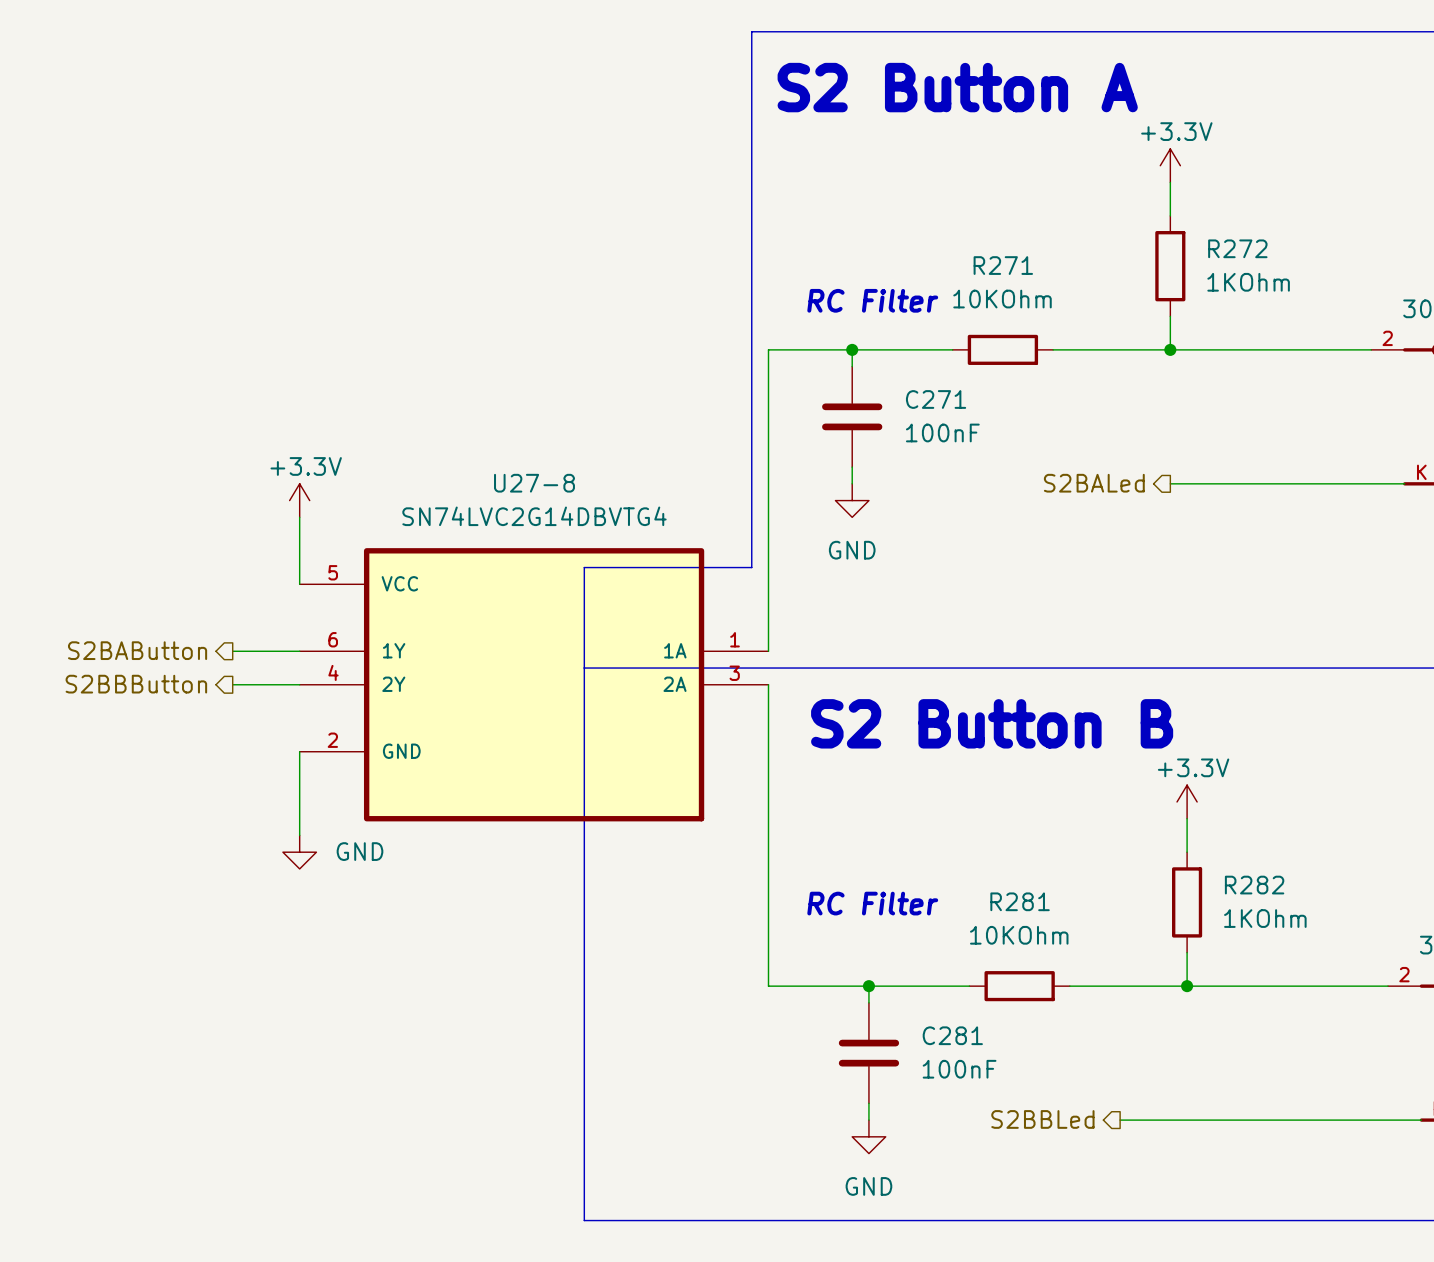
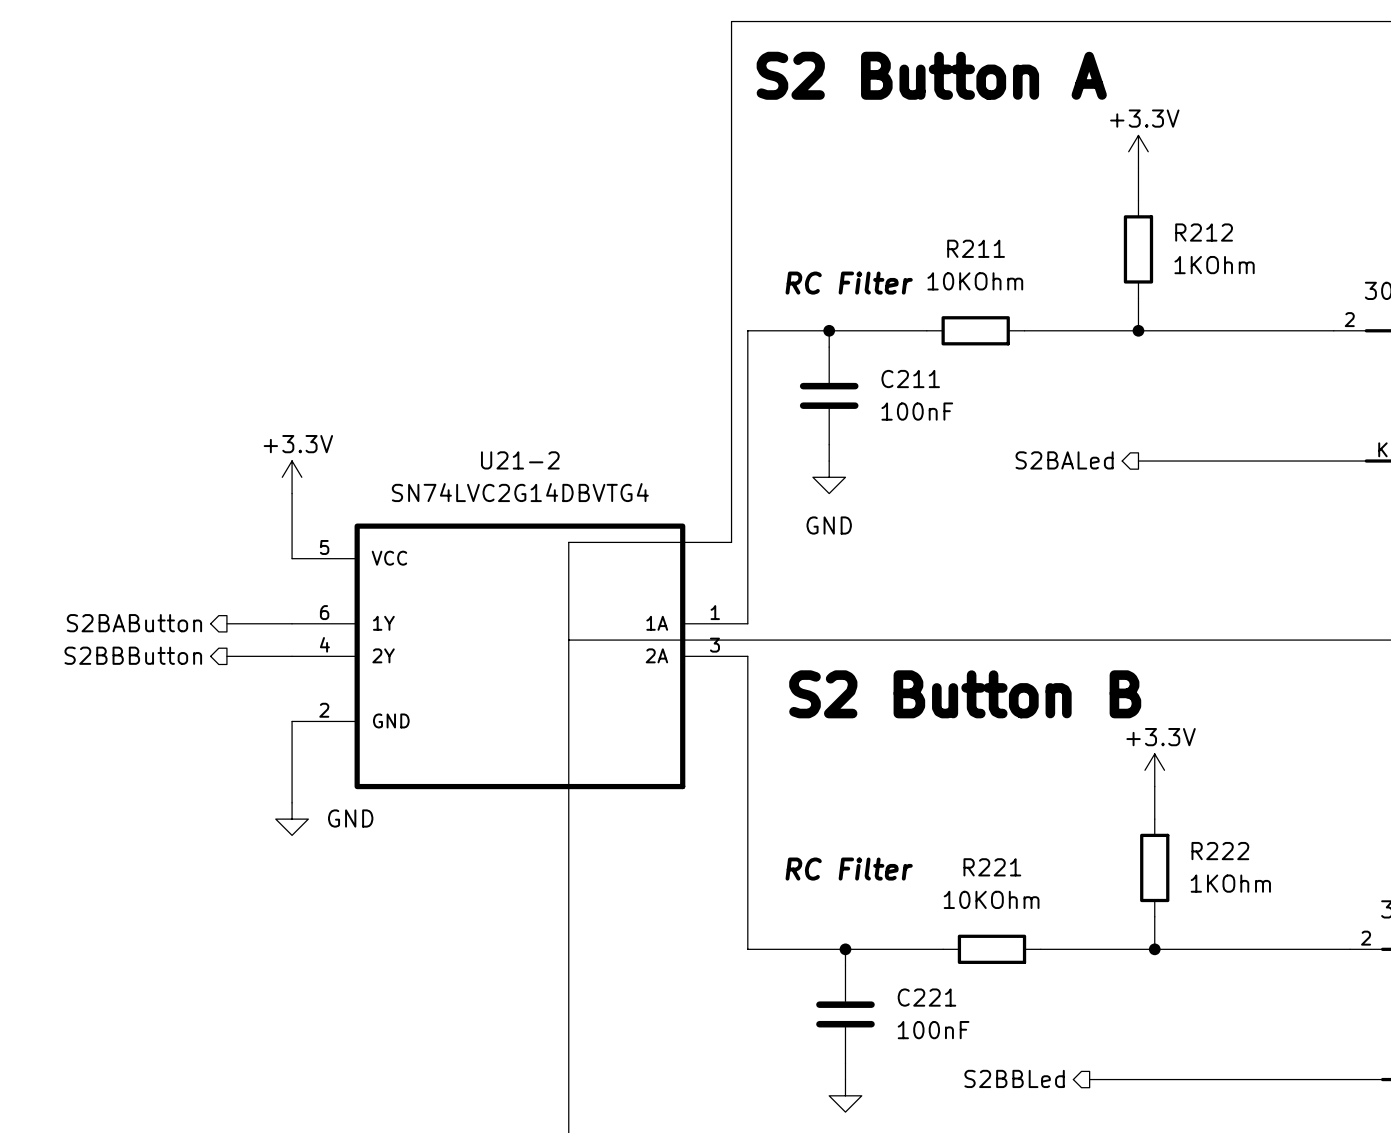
R272 name: R272 (1237, 248) -> R212 (1204, 232)
R271 name: R271 (1003, 265) -> R211 (976, 248)
C271 name: C271 (936, 399) -> C211 (910, 379)
U27-8 name: U27-8 (534, 483) -> U21-2 (520, 460)
R282 name: R282 (1254, 885) -> R222 (1220, 851)
R281 name: R281 (1020, 901) -> R221 (992, 867)
C281 name: C281 (952, 1035) -> C221 (926, 997)

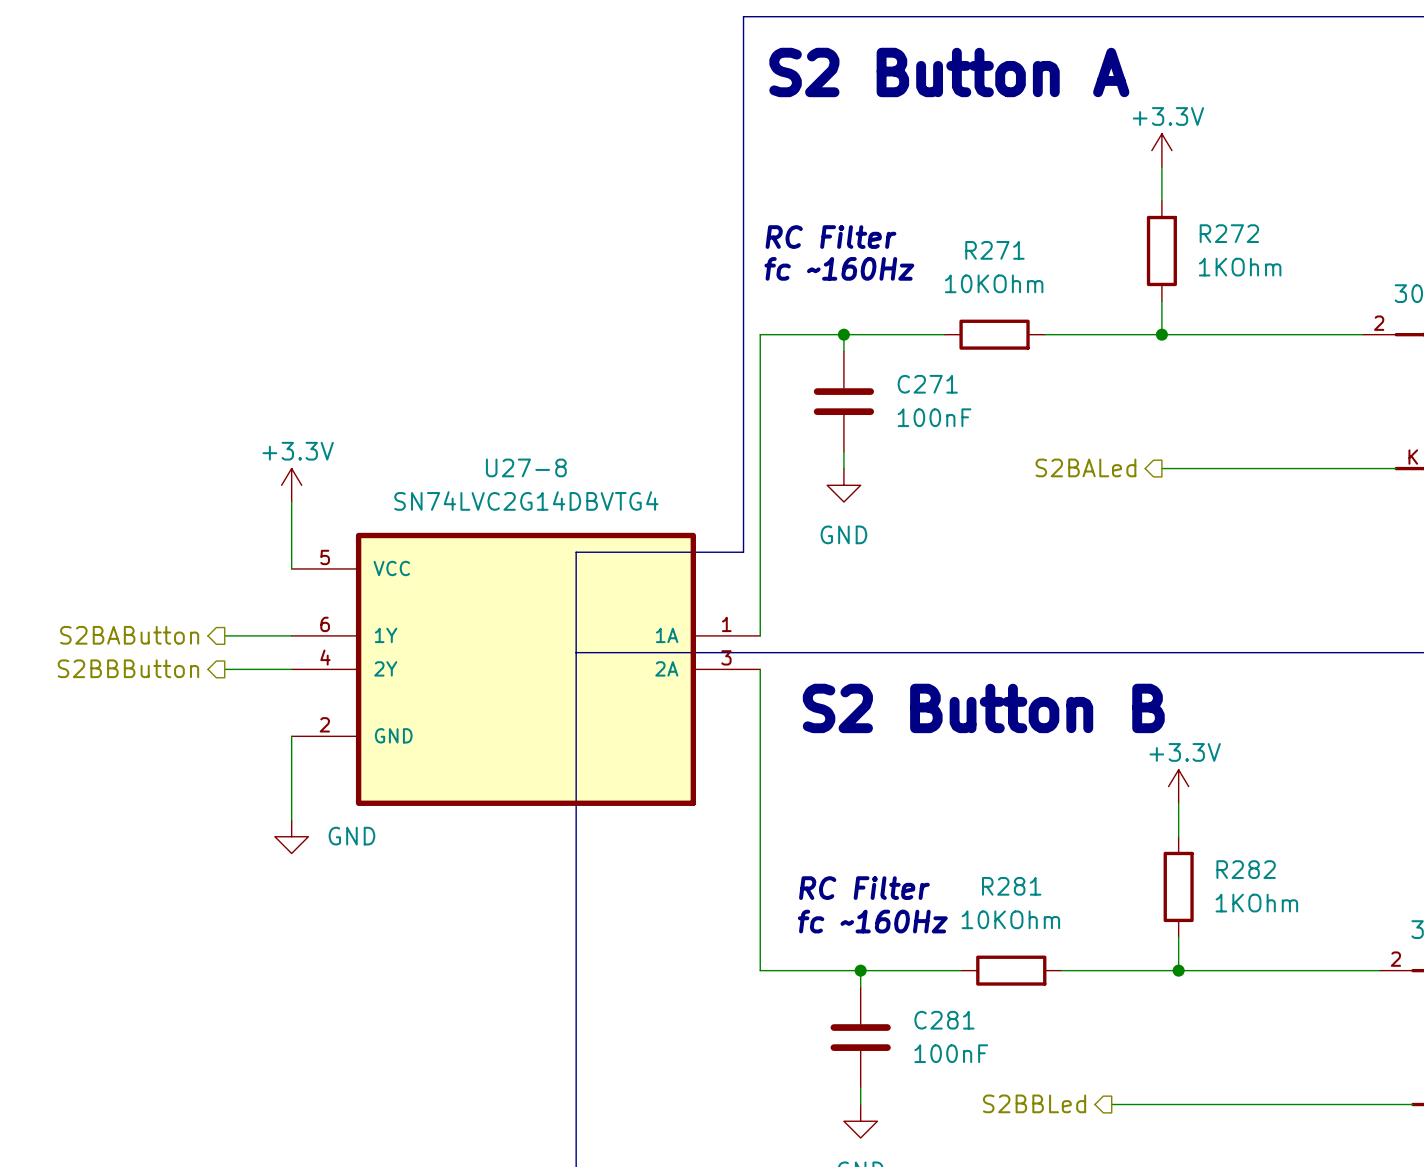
R212 name: R212 (1204, 232) -> R272 (1229, 233)
R211 name: R211 (976, 248) -> R271 (994, 250)
text: none -> fc ~160Hz (839, 268)
text position: RC Filter (849, 283) -> RC Filter (830, 237)
C211 name: C211 (910, 379) -> C271 (927, 384)
U21-2 name: U21-2 (520, 460) -> U27-8 (526, 467)
R222 name: R222 (1220, 851) -> R282 (1246, 869)
R221 name: R221 (992, 867) -> R281 (1011, 886)
text: none -> fc ~160Hz (872, 921)
C221 name: C221 (926, 997) -> C281 (944, 1020)

